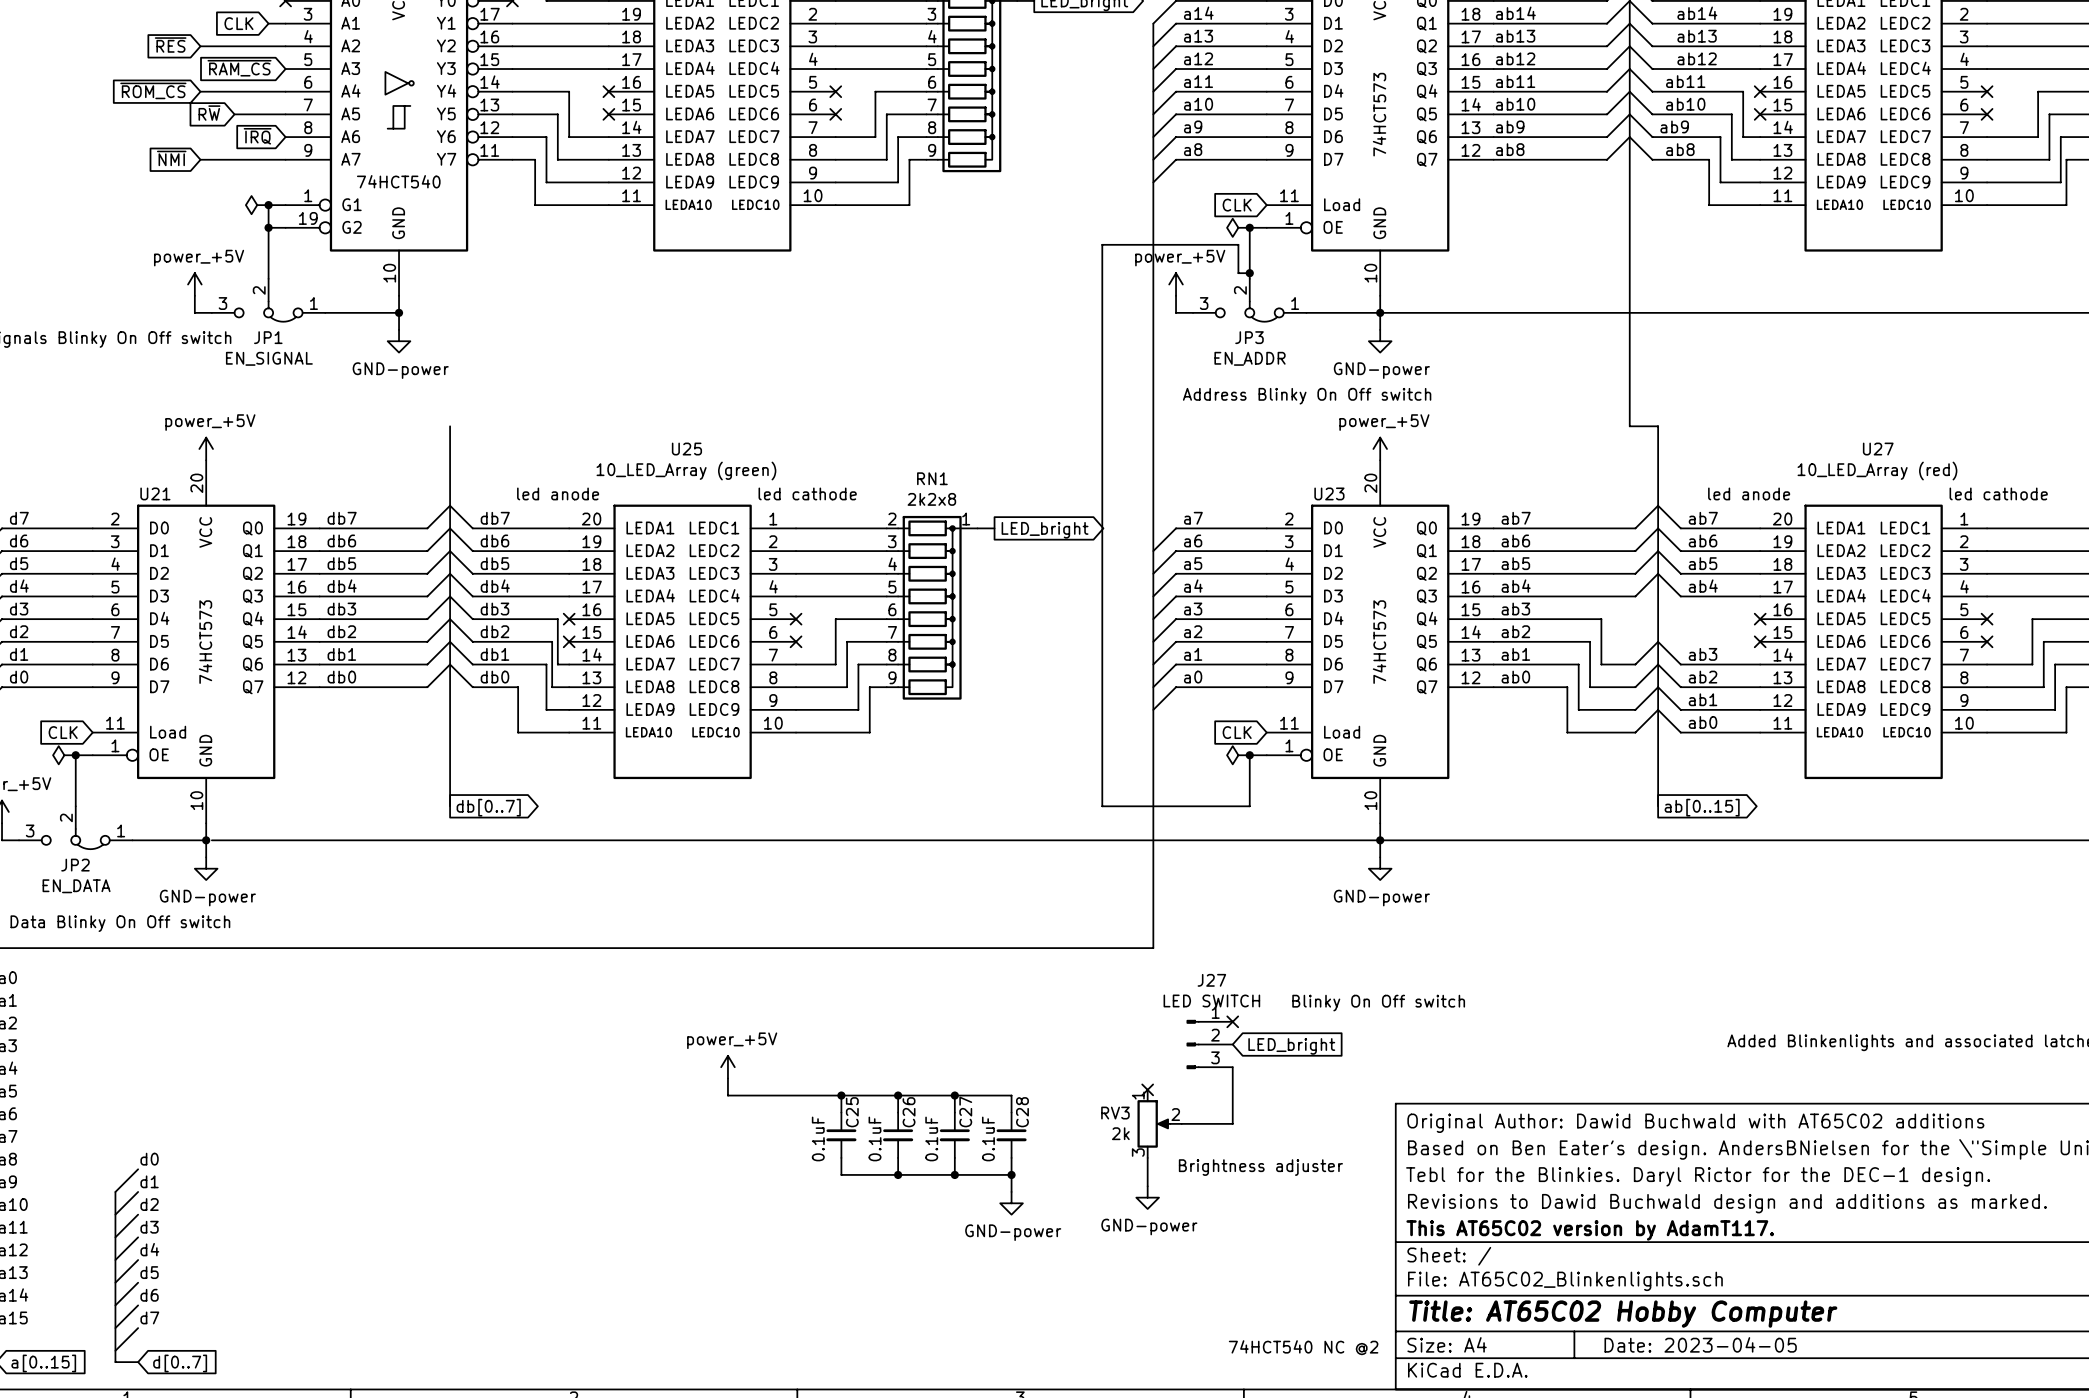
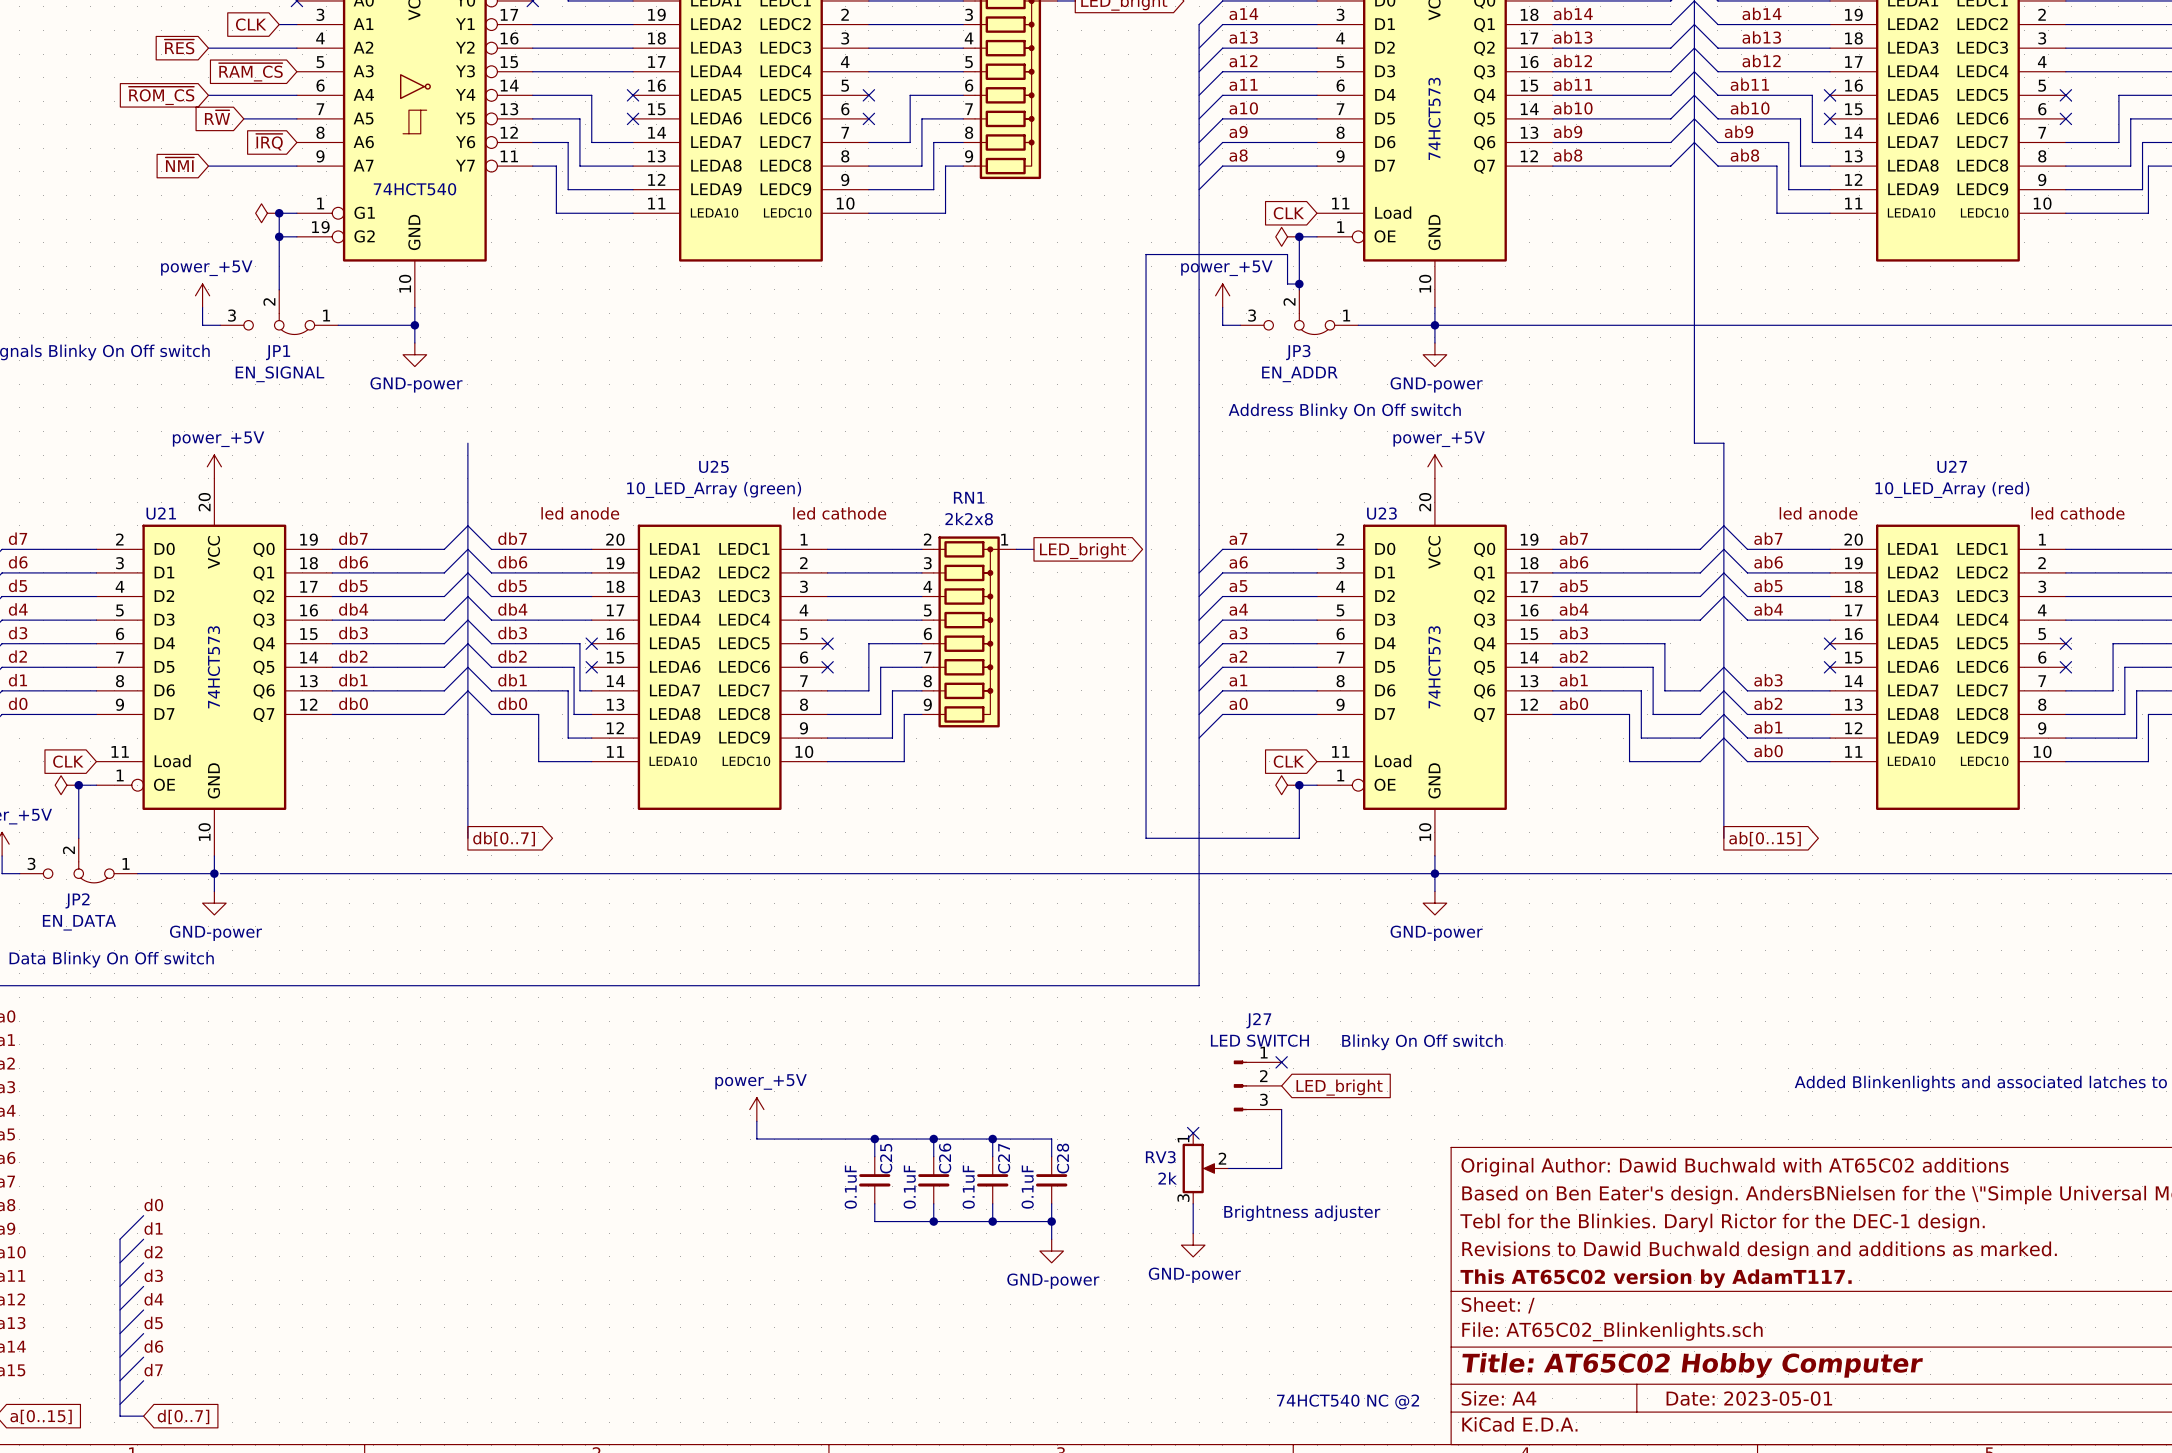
title block: Date: 2023-04-05 (1700, 1344) -> Date: 2023-05-01 (1749, 1398)

